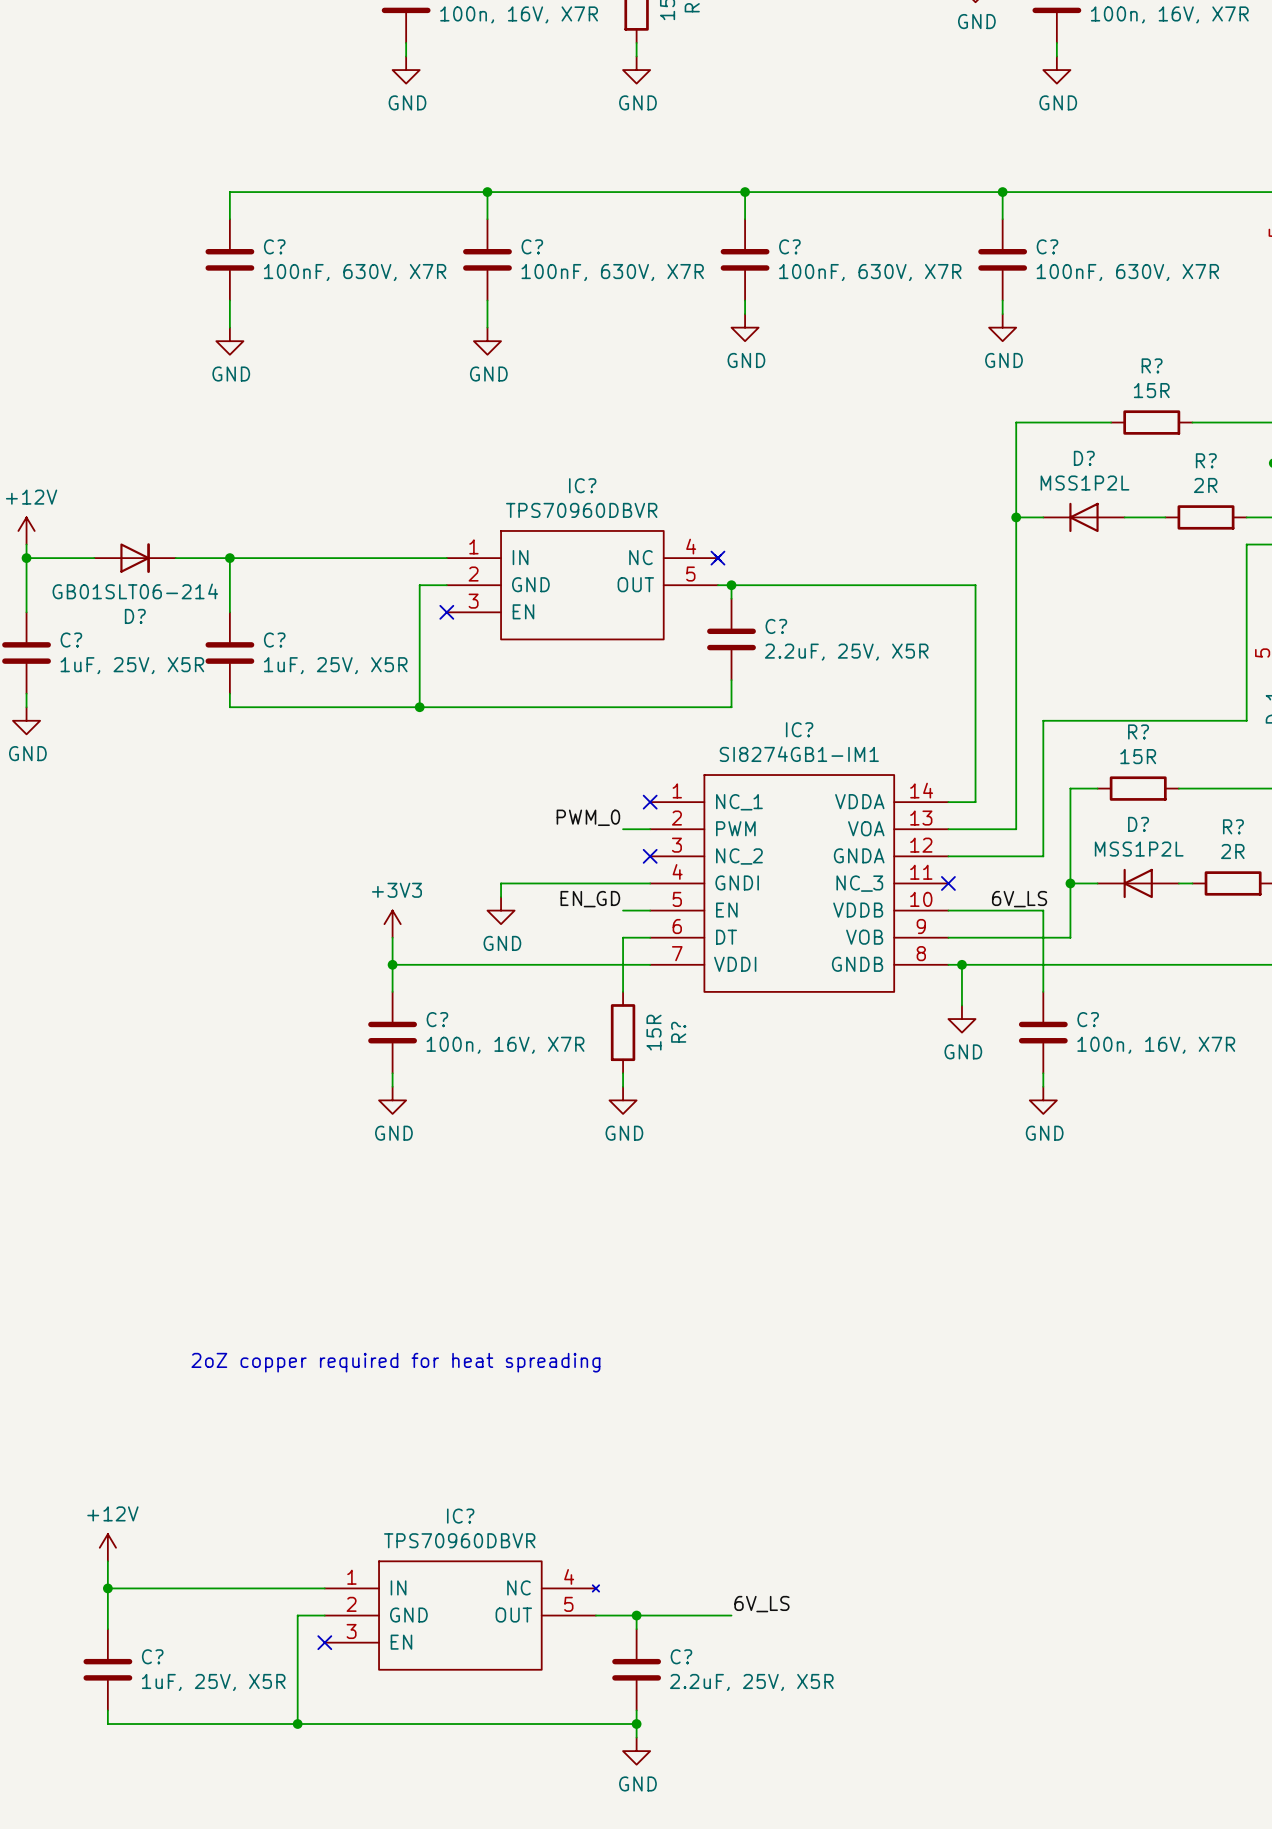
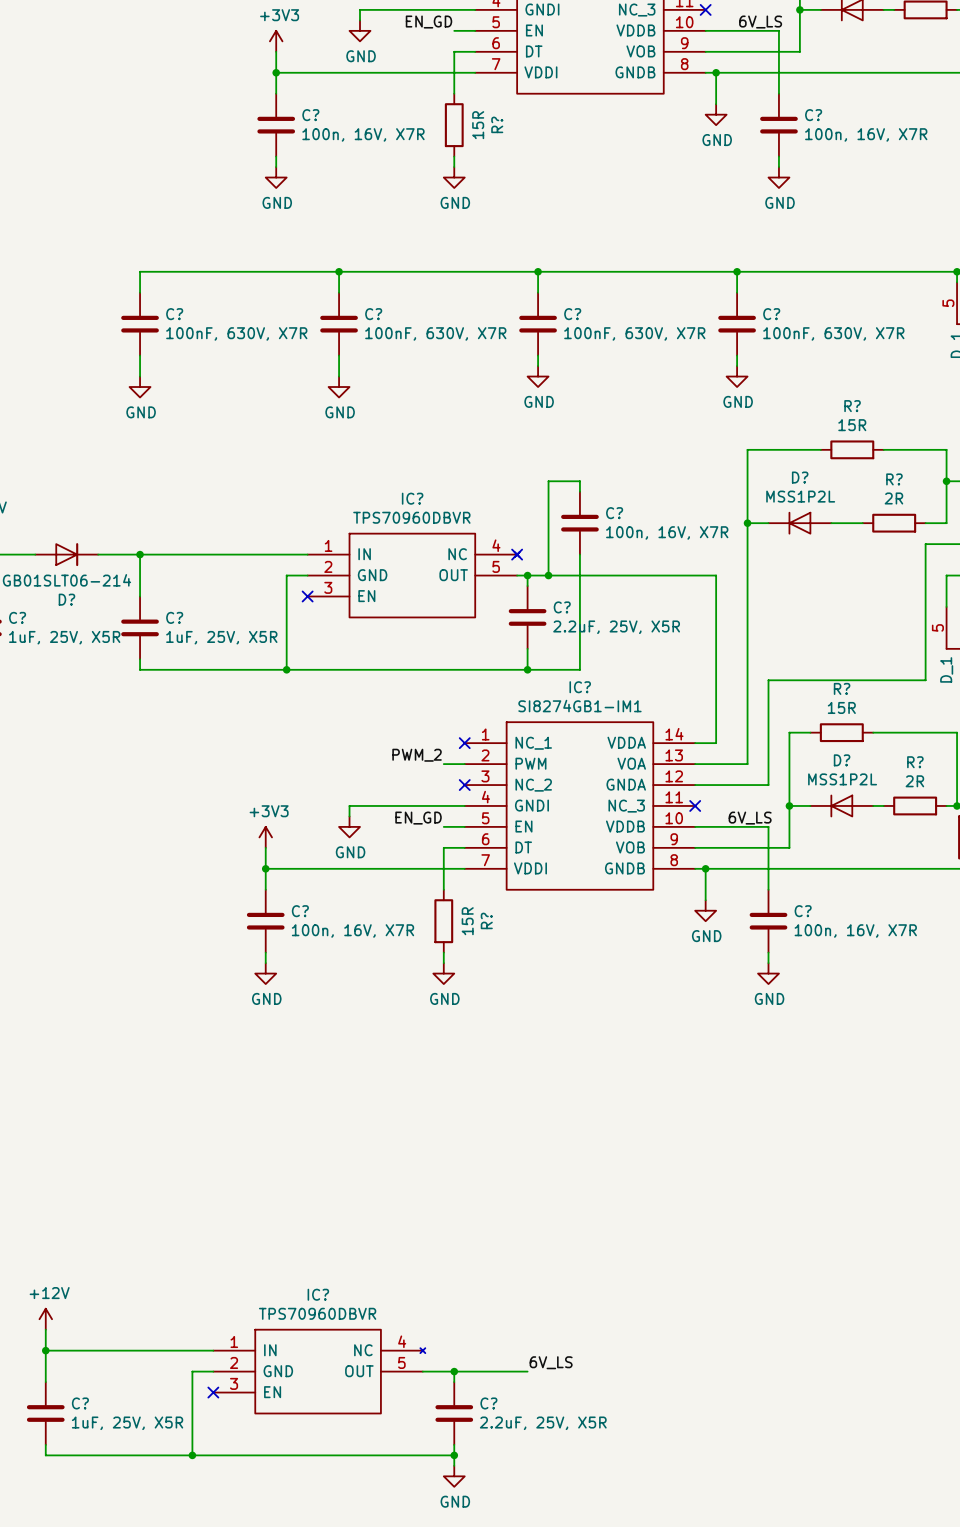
wire: none -> (579, 491) (579, 481) (548, 481) (548, 575)
C?: none -> 100n, 16V, X7R (579, 523)
wire: none -> (579, 554) (579, 669) (527, 669)
junction: none -> (548, 575)
junction: none -> (527, 669)
label: PWM_0 (588, 817) -> PWM_2 (417, 755)
text: 2oZ copper required for heat spreading (395, 1362) -> none

